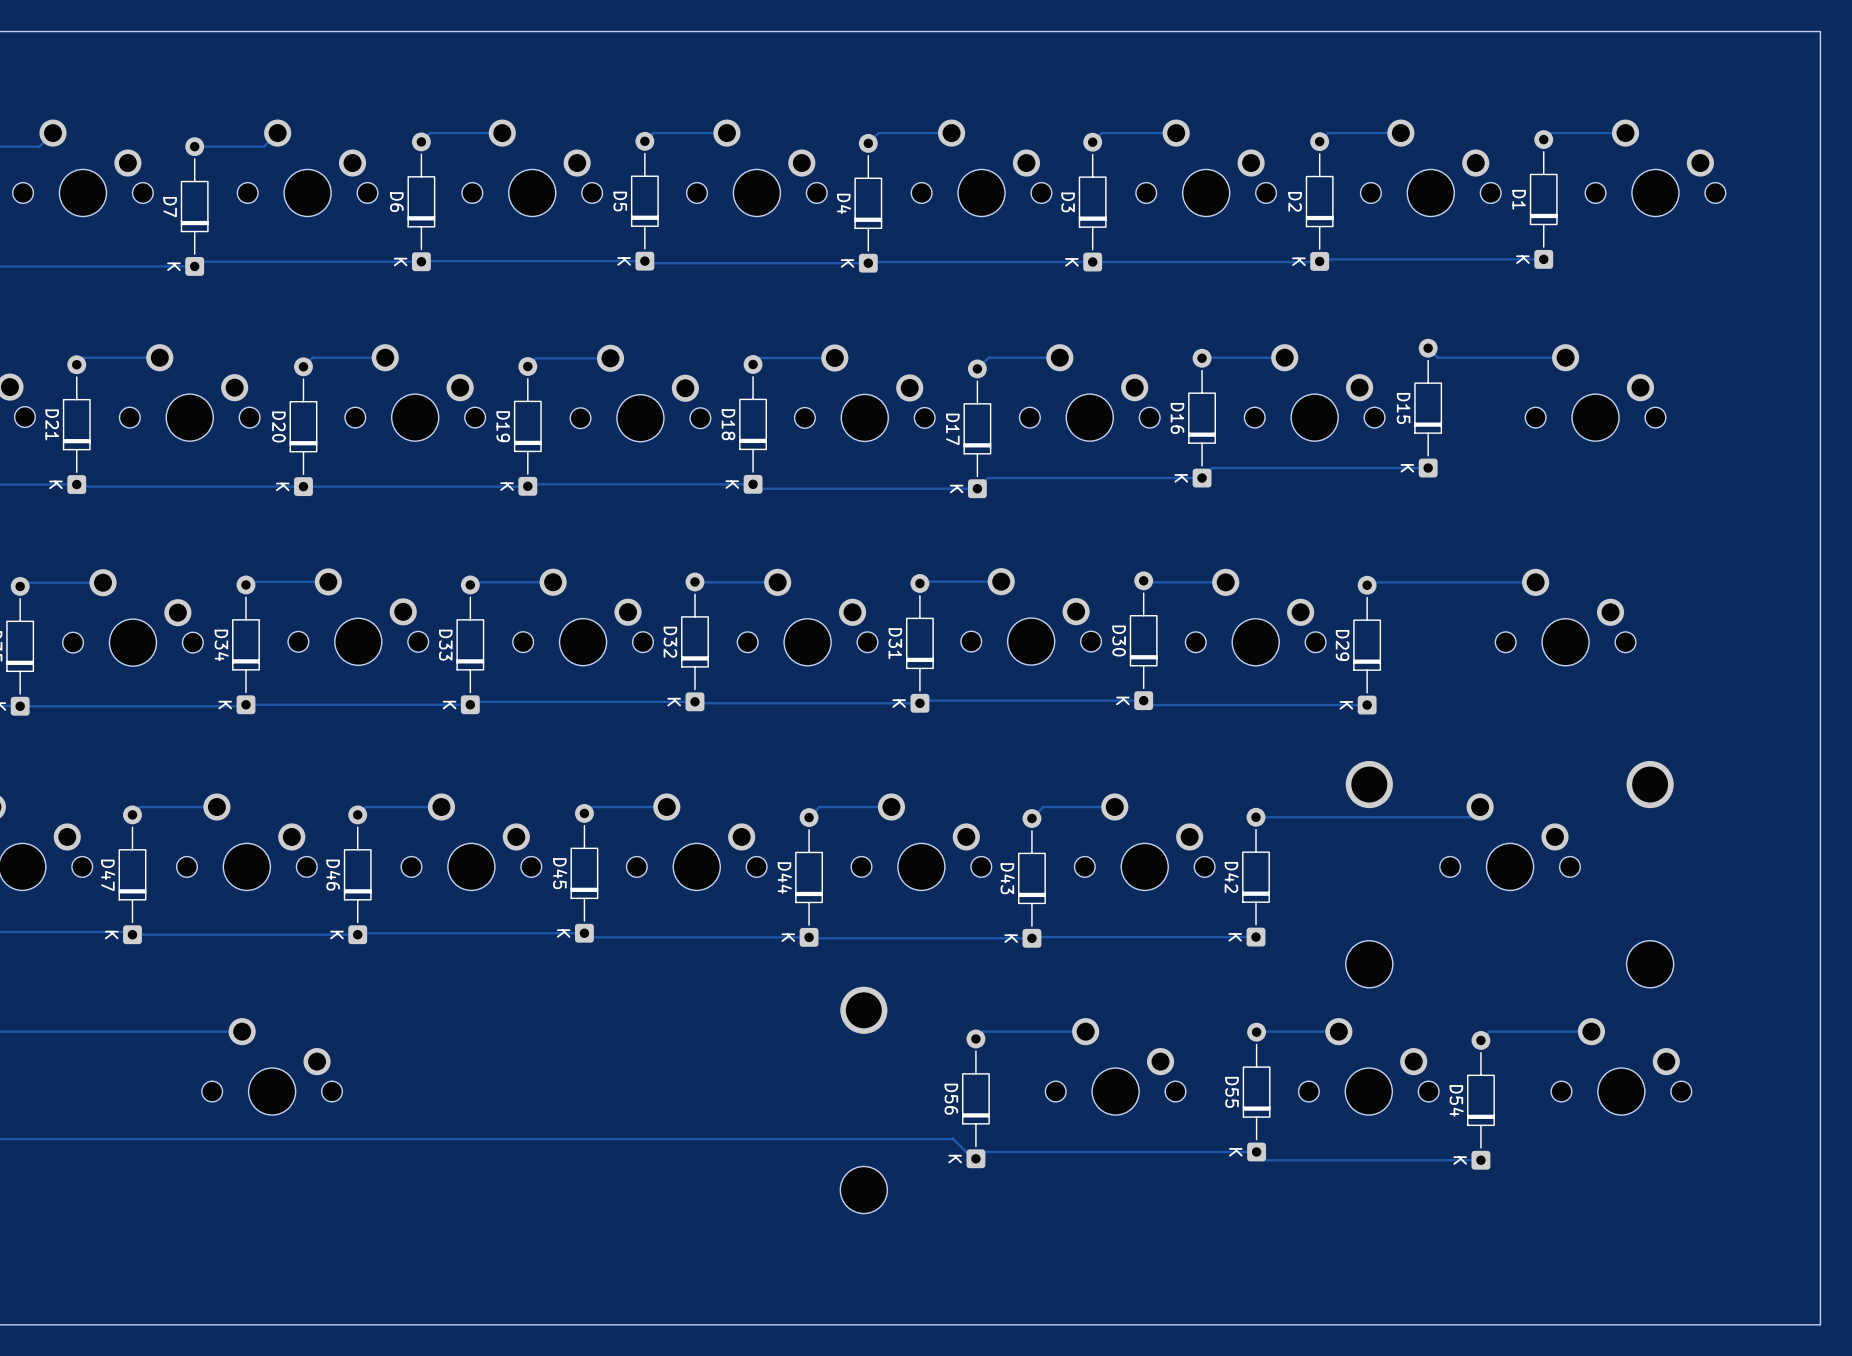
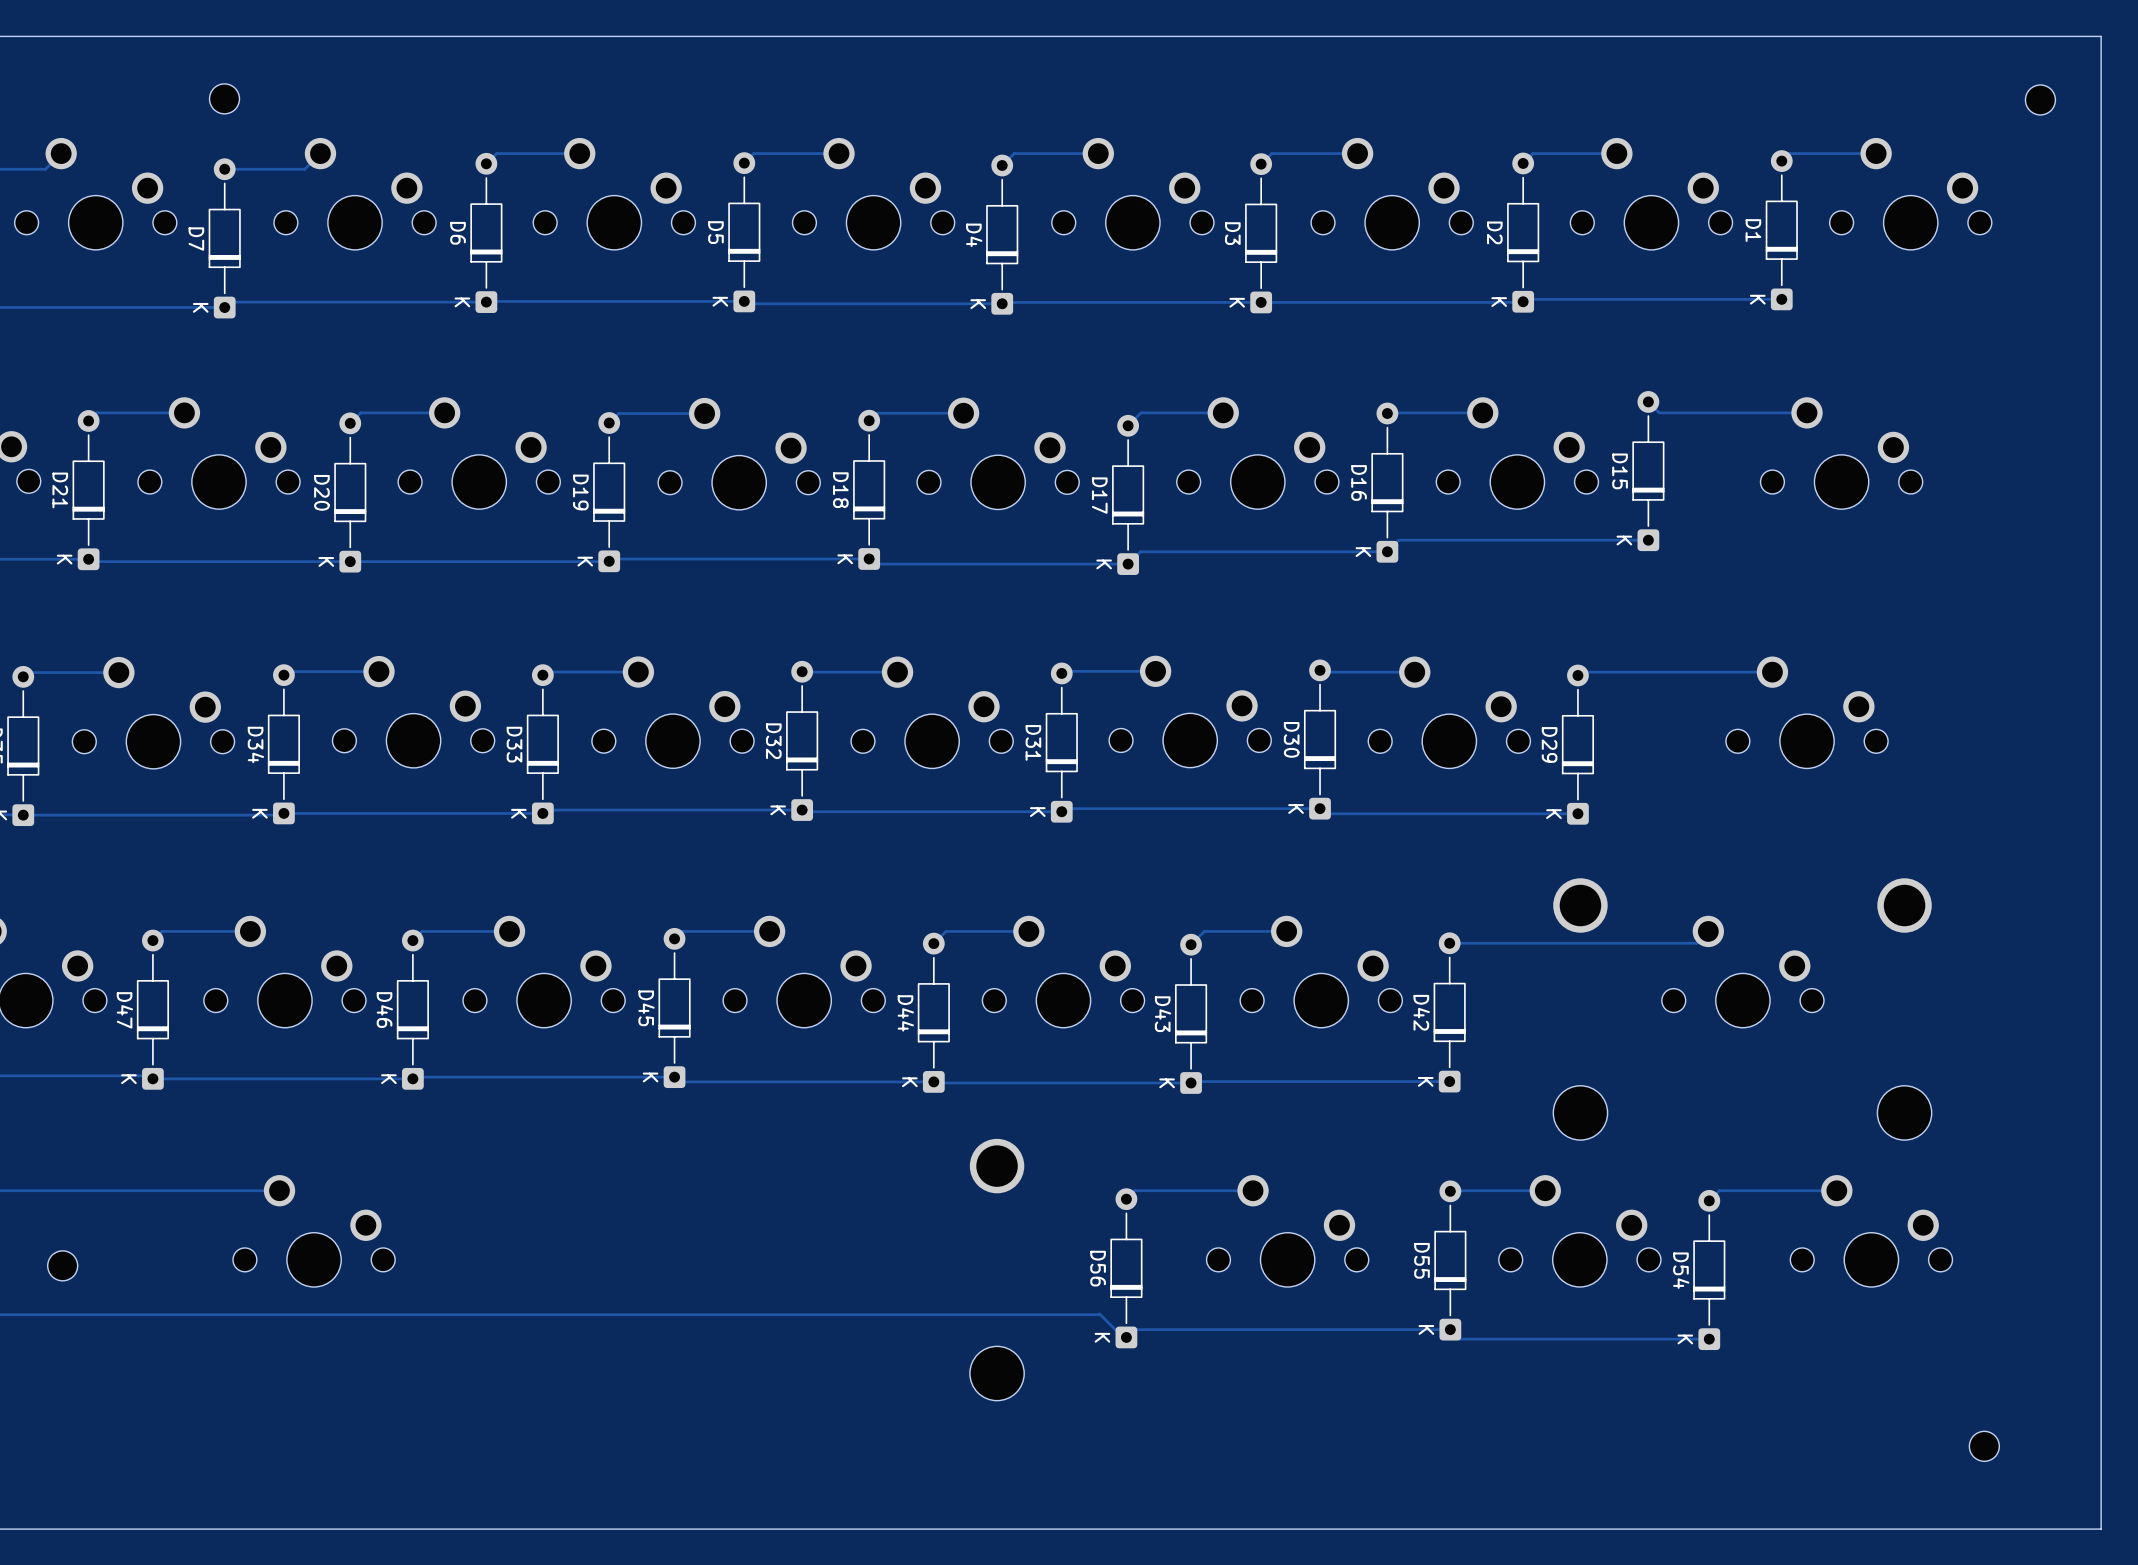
part: none -> (224, 98)
part: none -> (2040, 99)
part: none -> (62, 1265)
part: none -> (1984, 1446)

